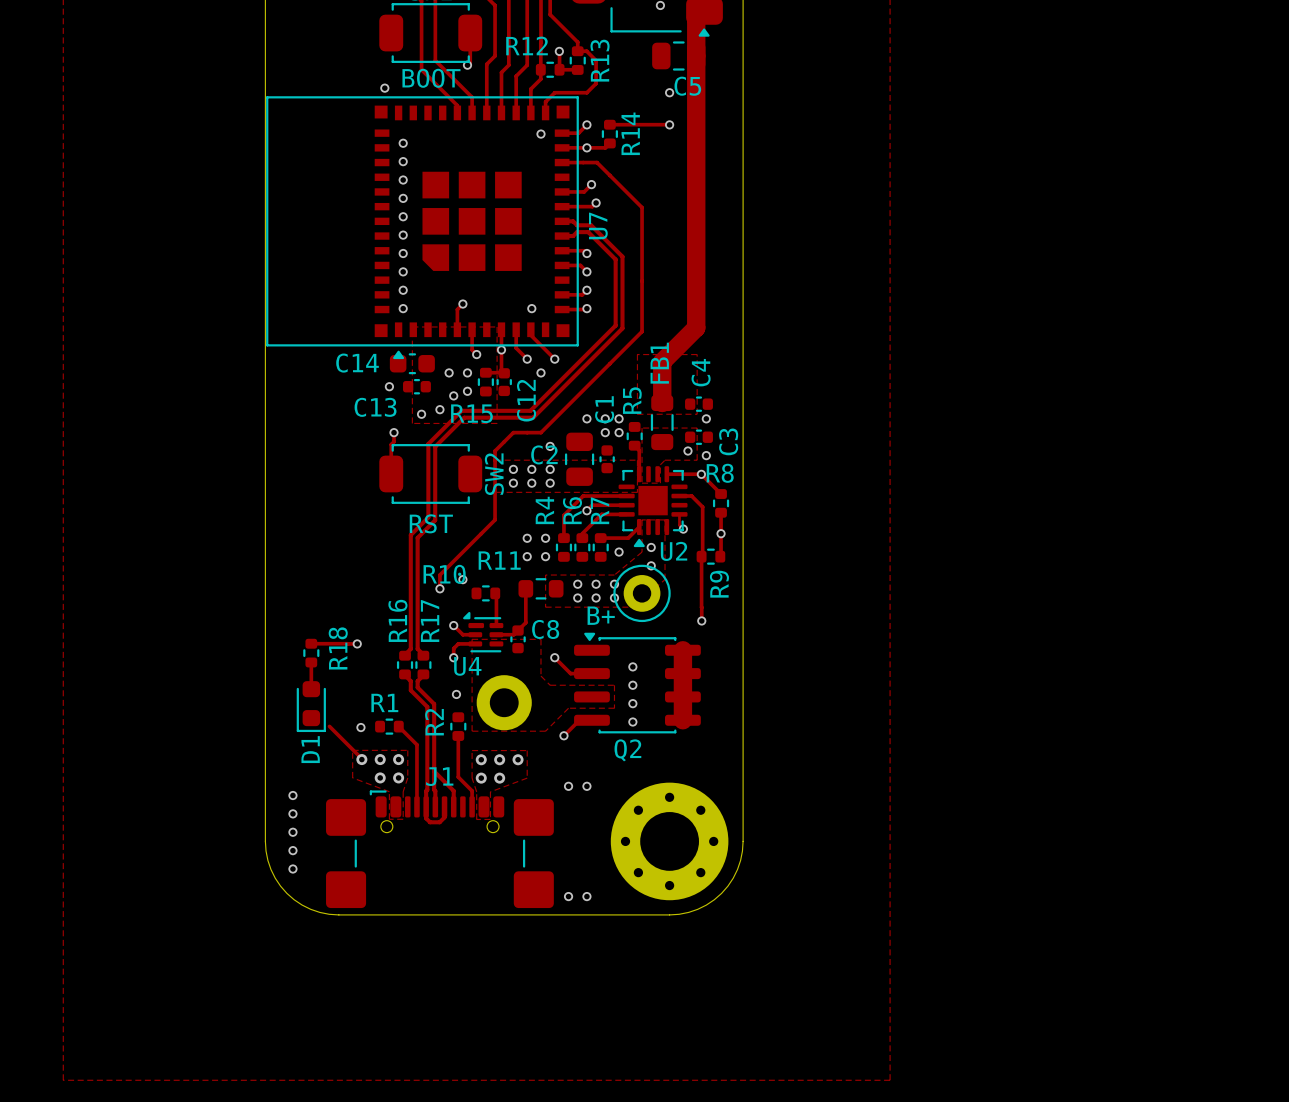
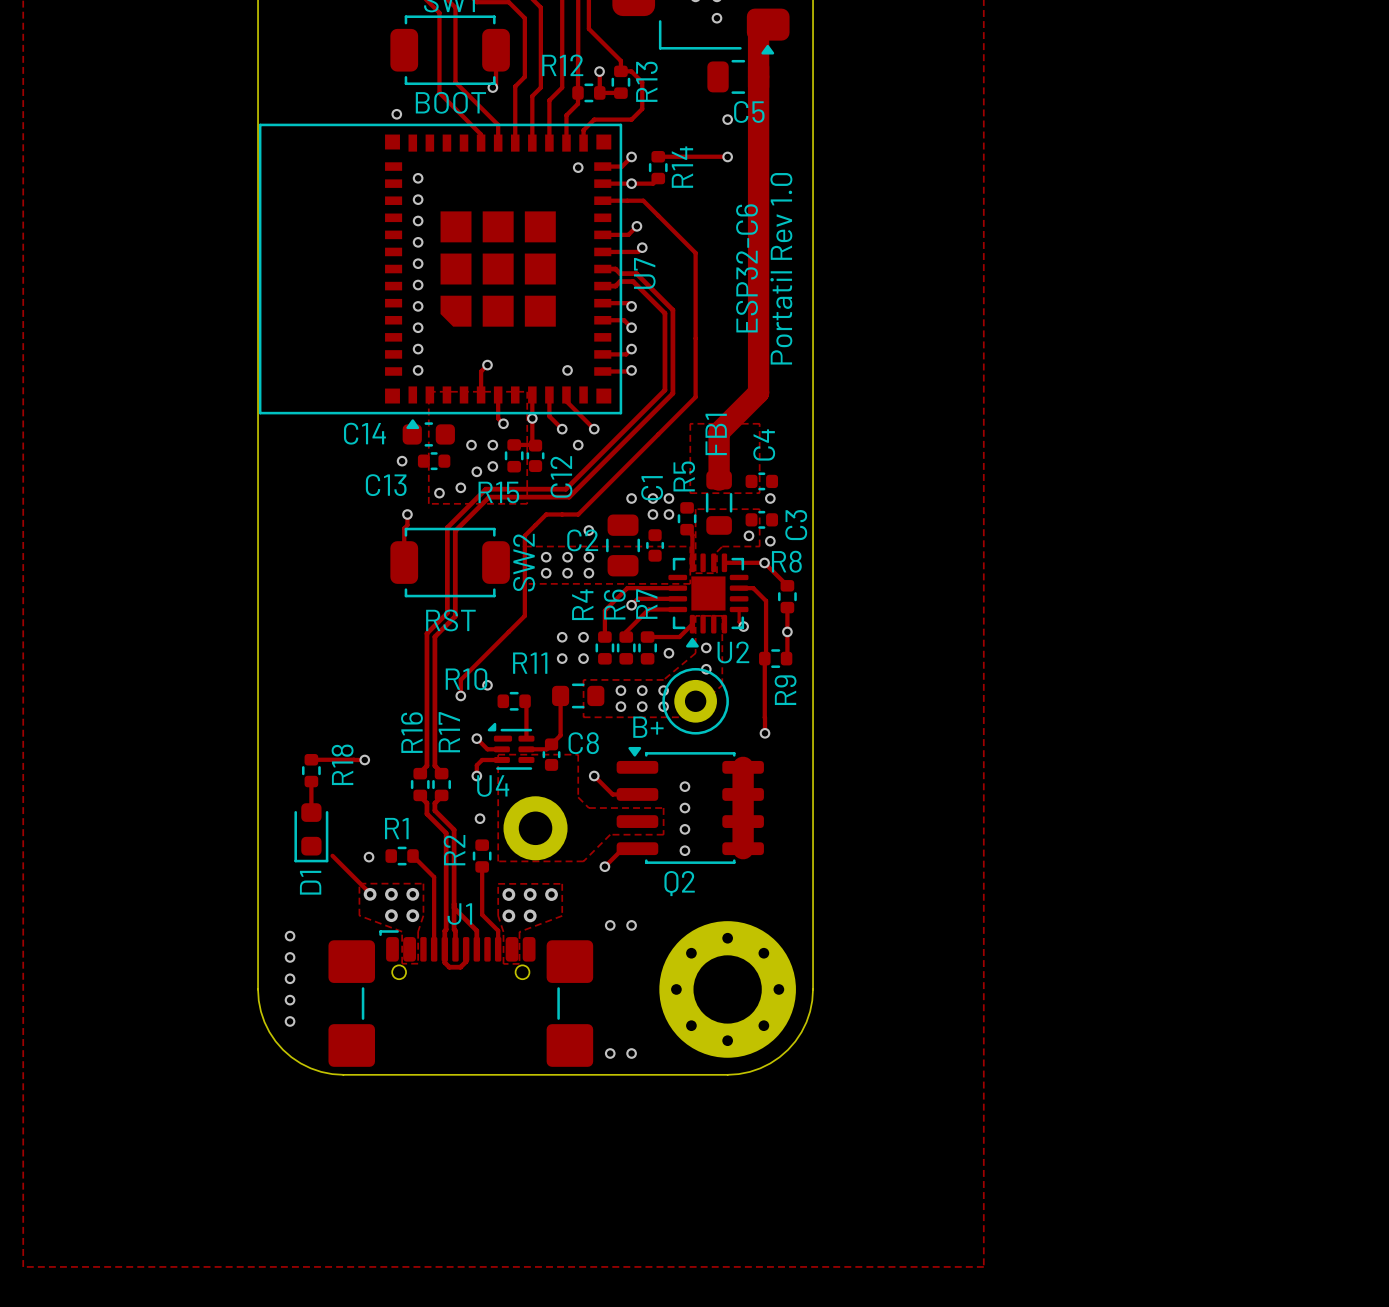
text: none -> ESP32-C6 (747, 268)
text: none -> Portatil Rev 1.0 (781, 268)

